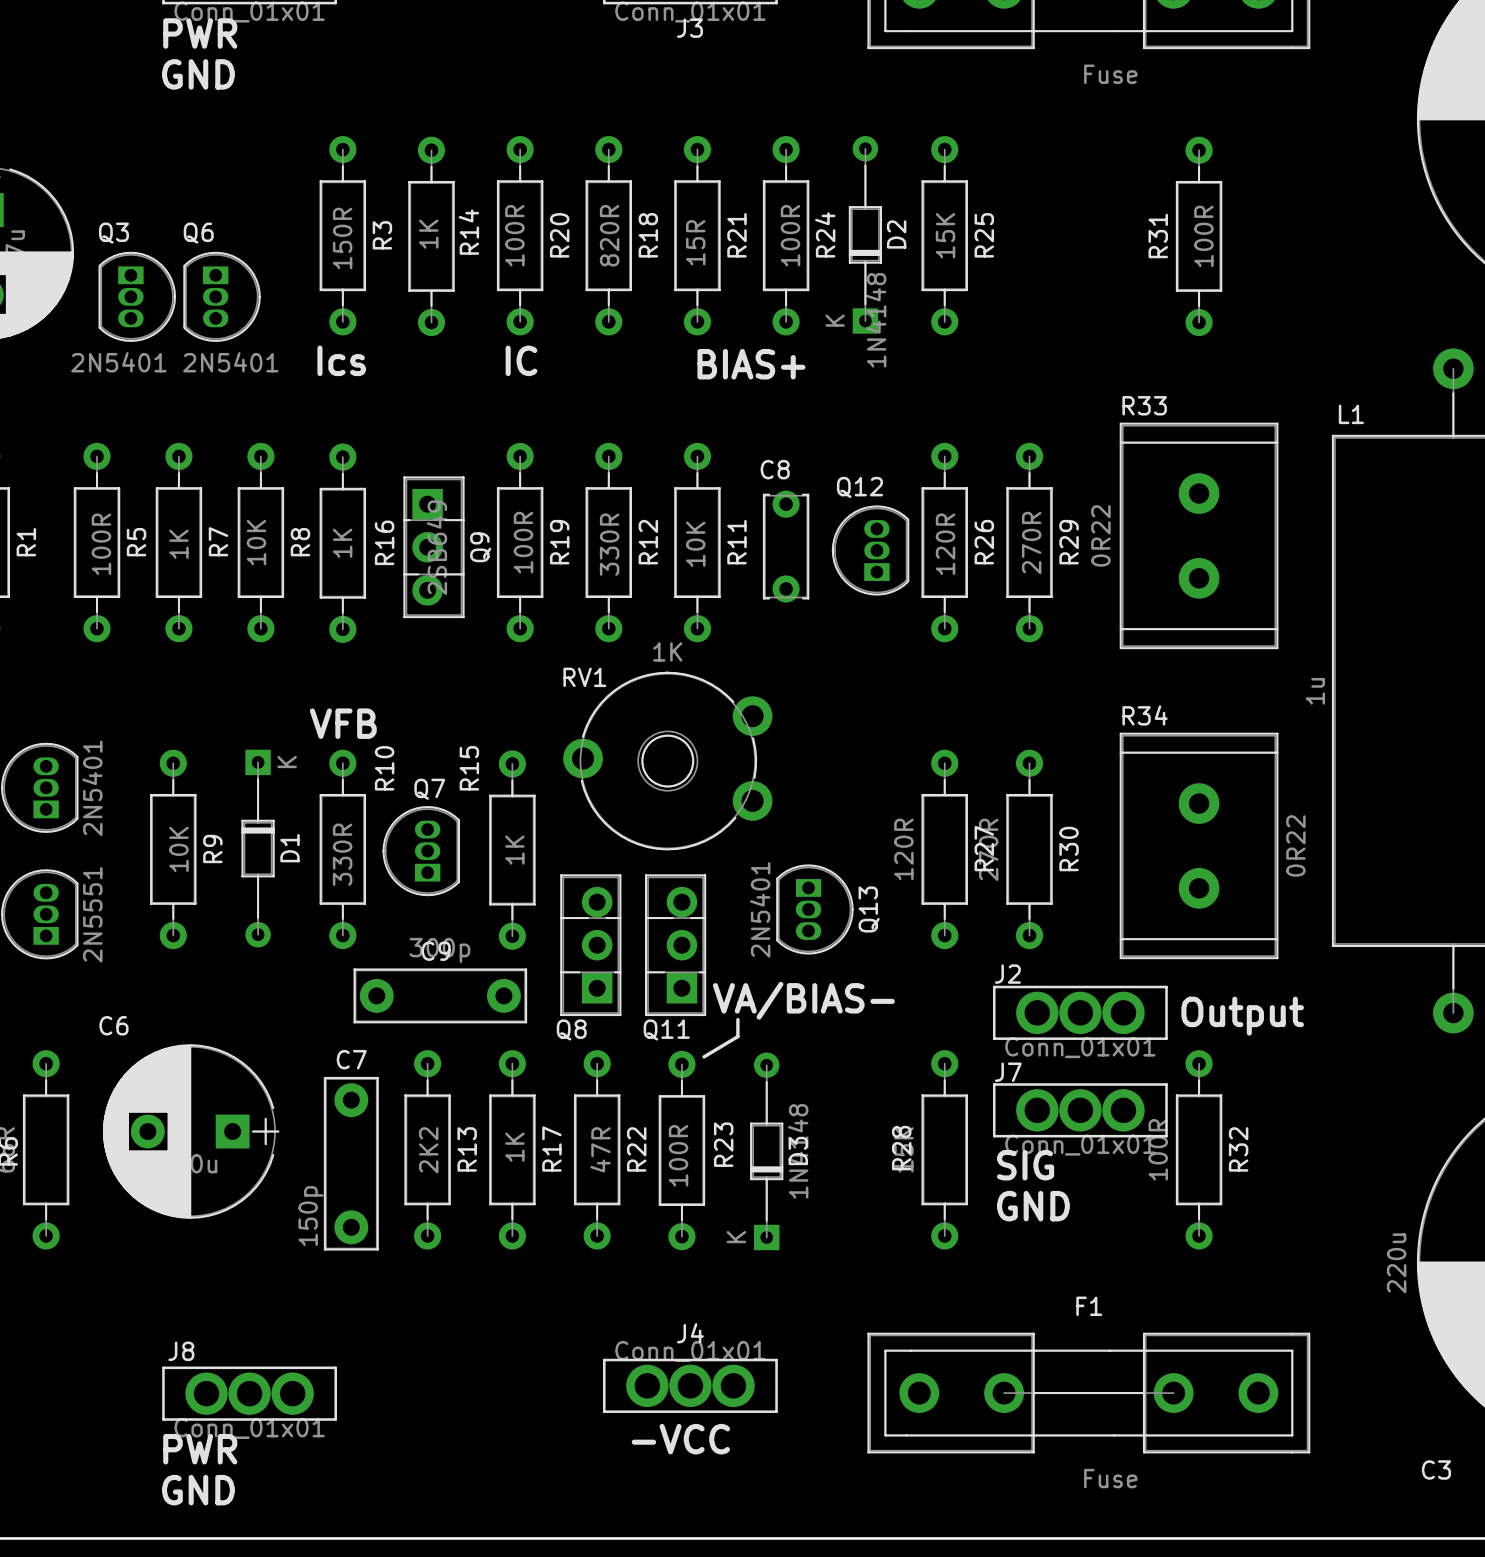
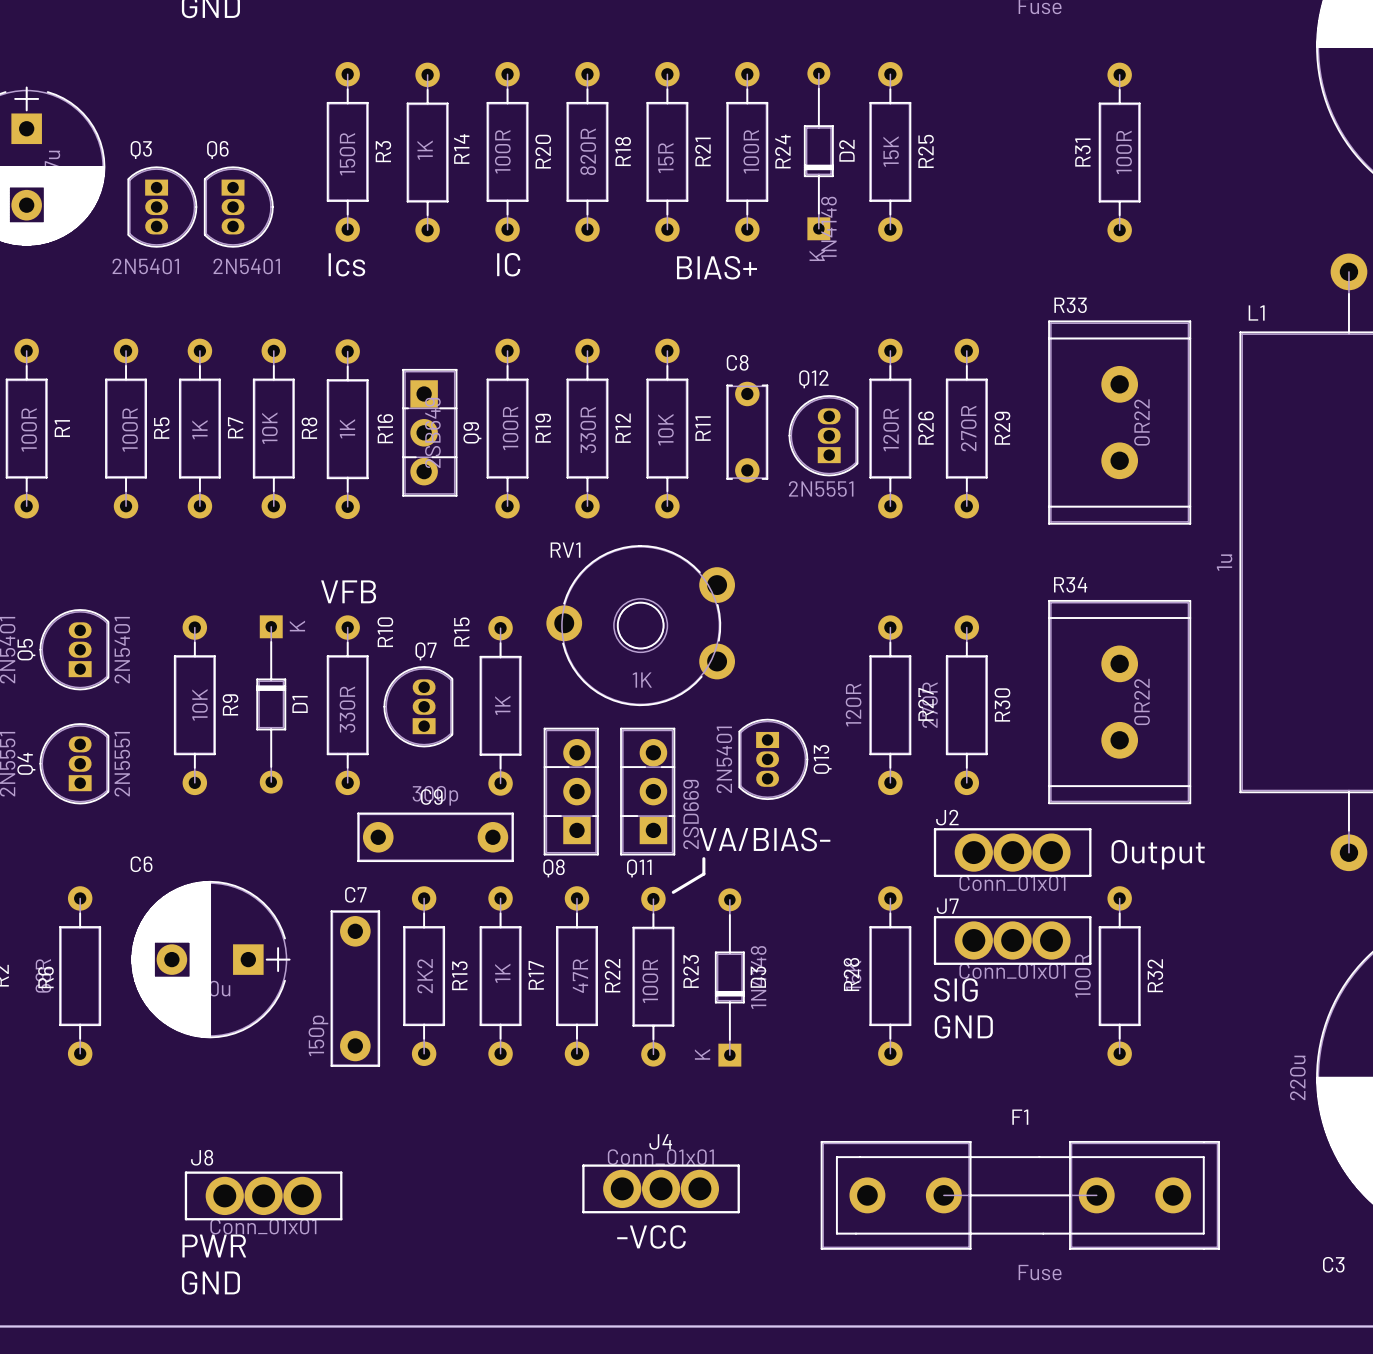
D2 text position: K (835, 320) -> K (817, 255)
R33 value position: 0R22 (1100, 535) -> 0R22 (1142, 422)
Q12 value: none -> 2N5551 (821, 488)
RV1 value position: 1K (667, 651) -> 1K (642, 680)
R34 value position: 0R22 (1295, 845) -> 0R22 (1142, 701)
Q11 value: none -> 2SD669 (691, 814)

